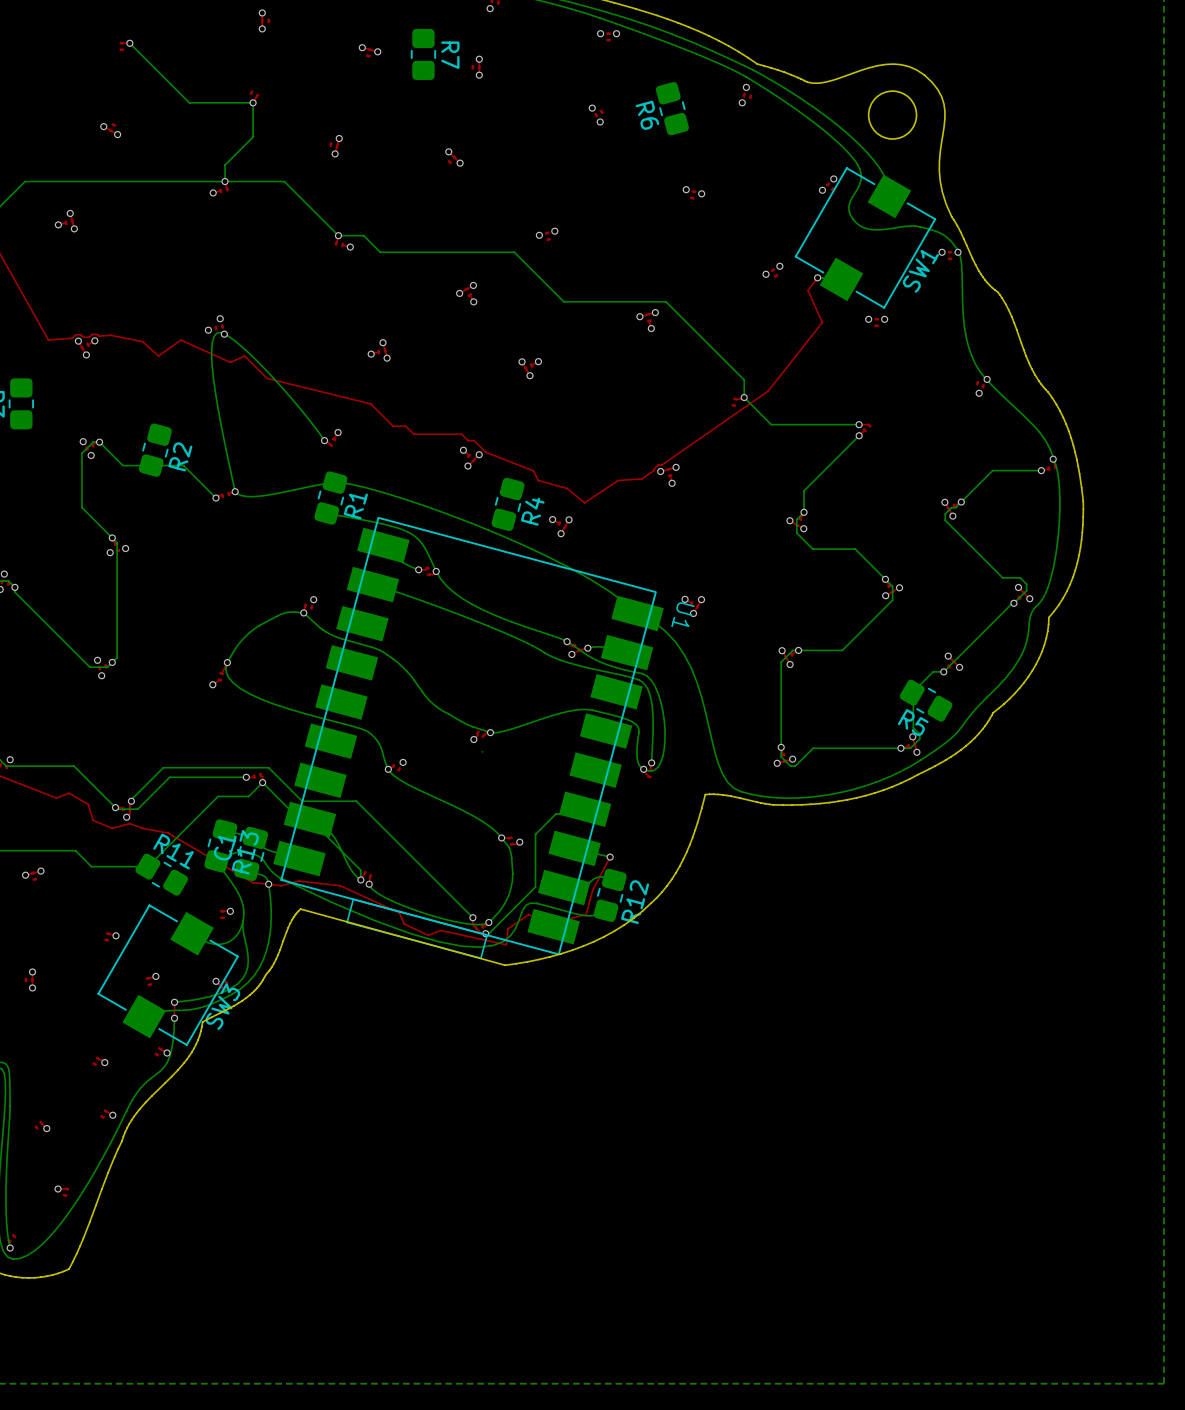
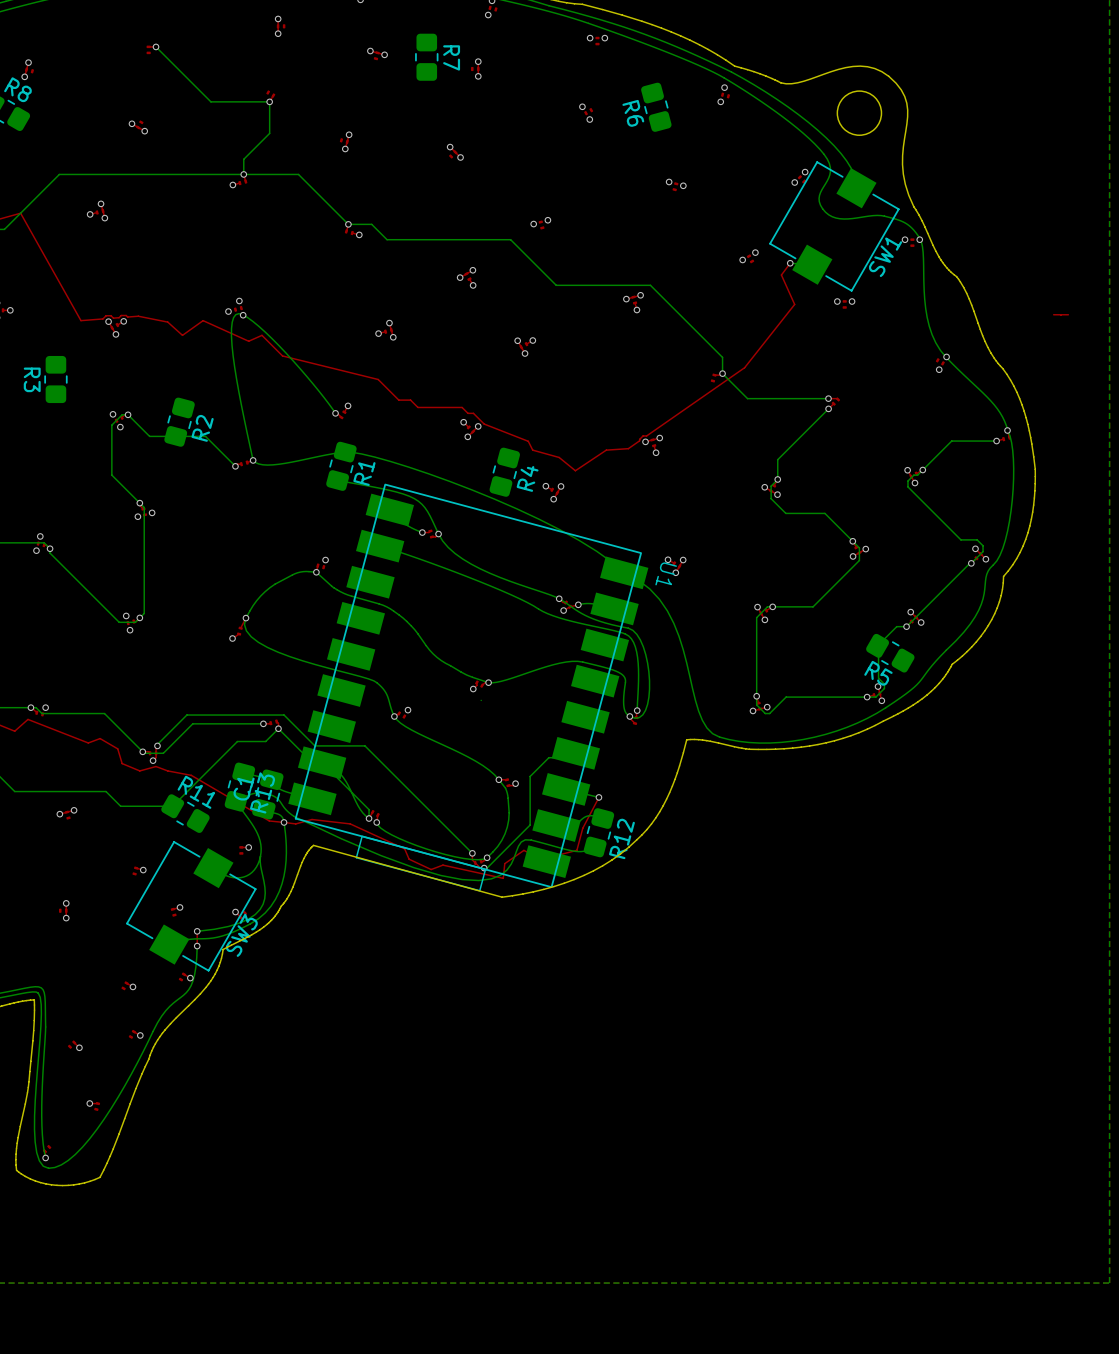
top track: none -> (1068, 314) (1053, 314)

